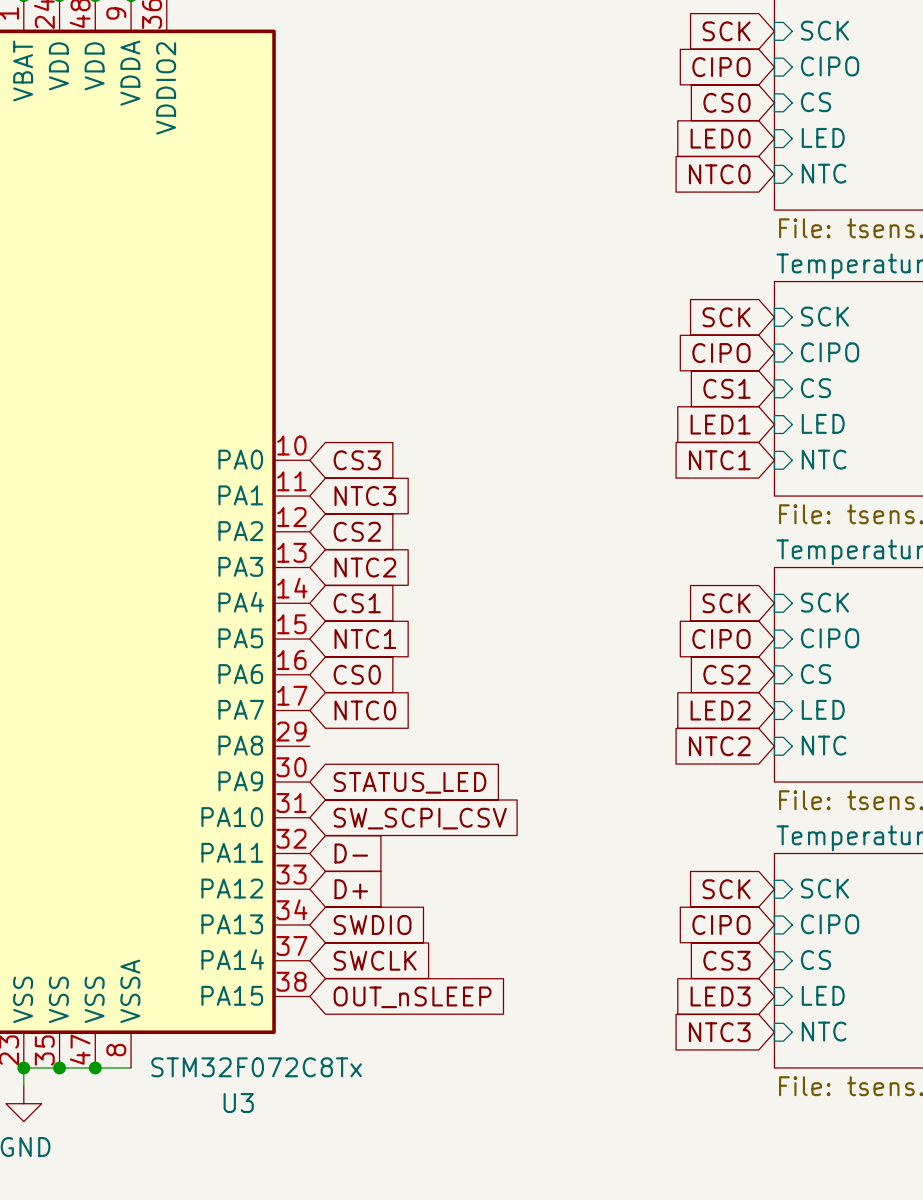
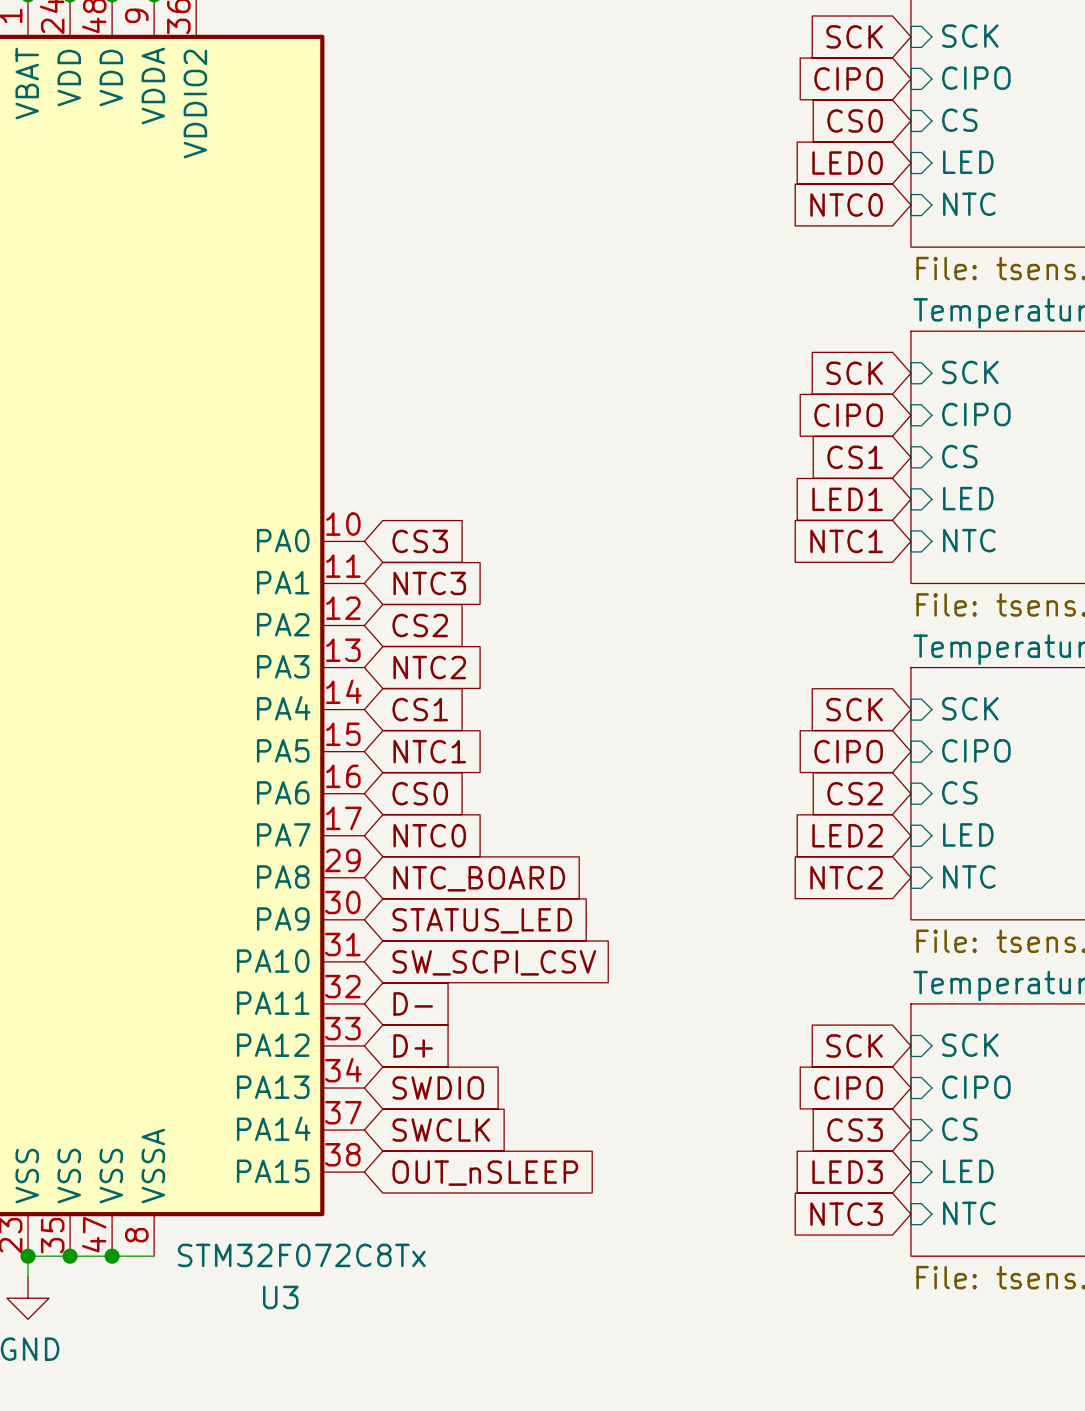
global label: none -> NTC_BOARD (479, 878)

